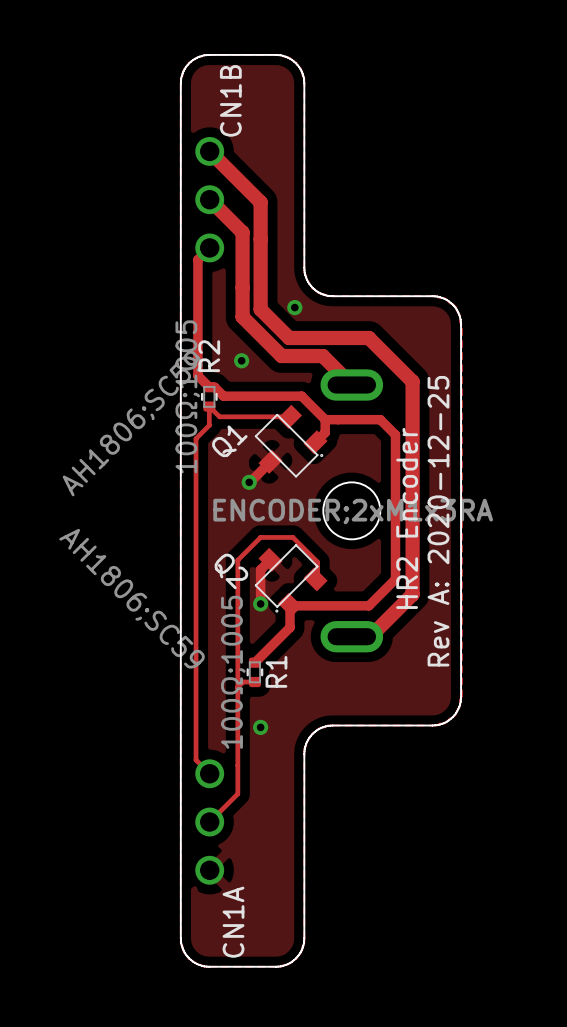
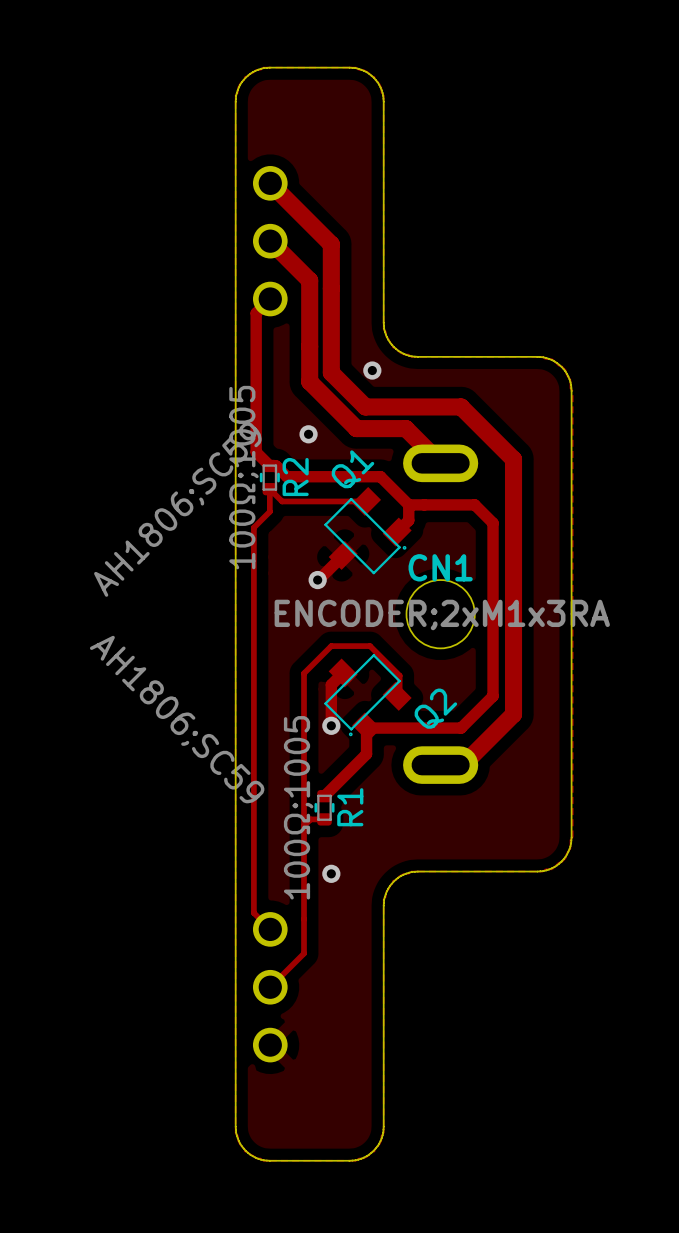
text: CN1B (230, 100) -> none
R2 name position: R2 (209, 356) -> R2 (295, 477)
Q1 name position: Q1 (229, 441) -> Q1 (352, 469)
text: HR2 Encoder (407, 518) -> none
text: Rev A: 2020-12-25 (438, 521) -> none
Q2 name rotation: 0° (231, 571) -> 90° counterclockwise (435, 708)
Q2 name position: Q2 (231, 571) -> Q2 (435, 708)
text: A (233, 894) -> none
CN1 name rotation: 0° (233, 931) -> 90° clockwise (440, 567)
CN1 name position: CN1 (233, 931) -> CN1 (440, 567)

